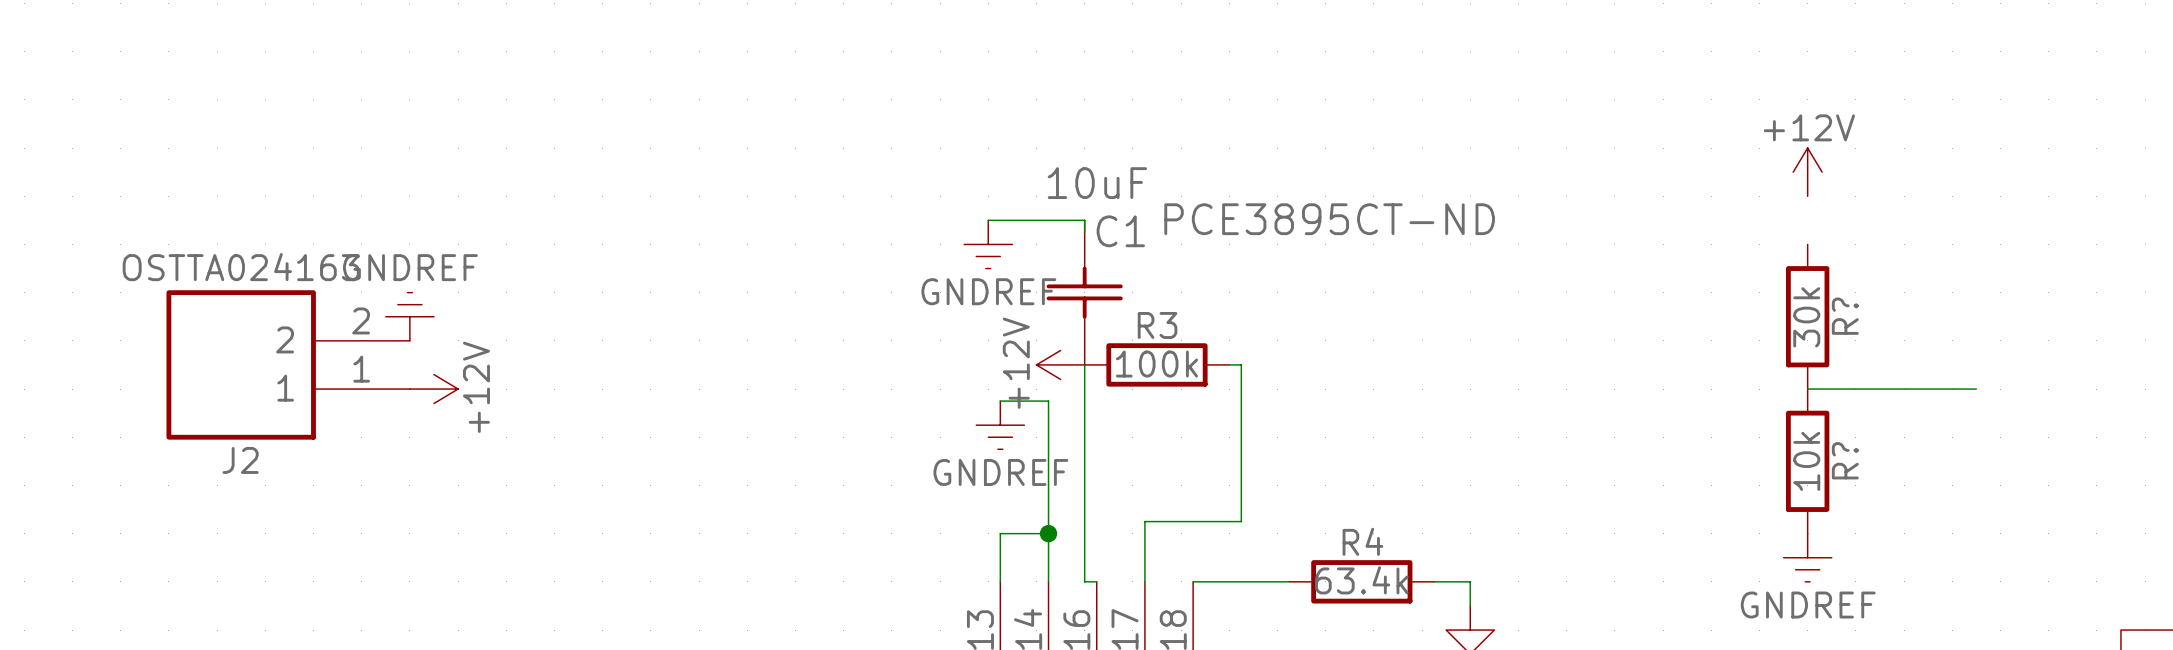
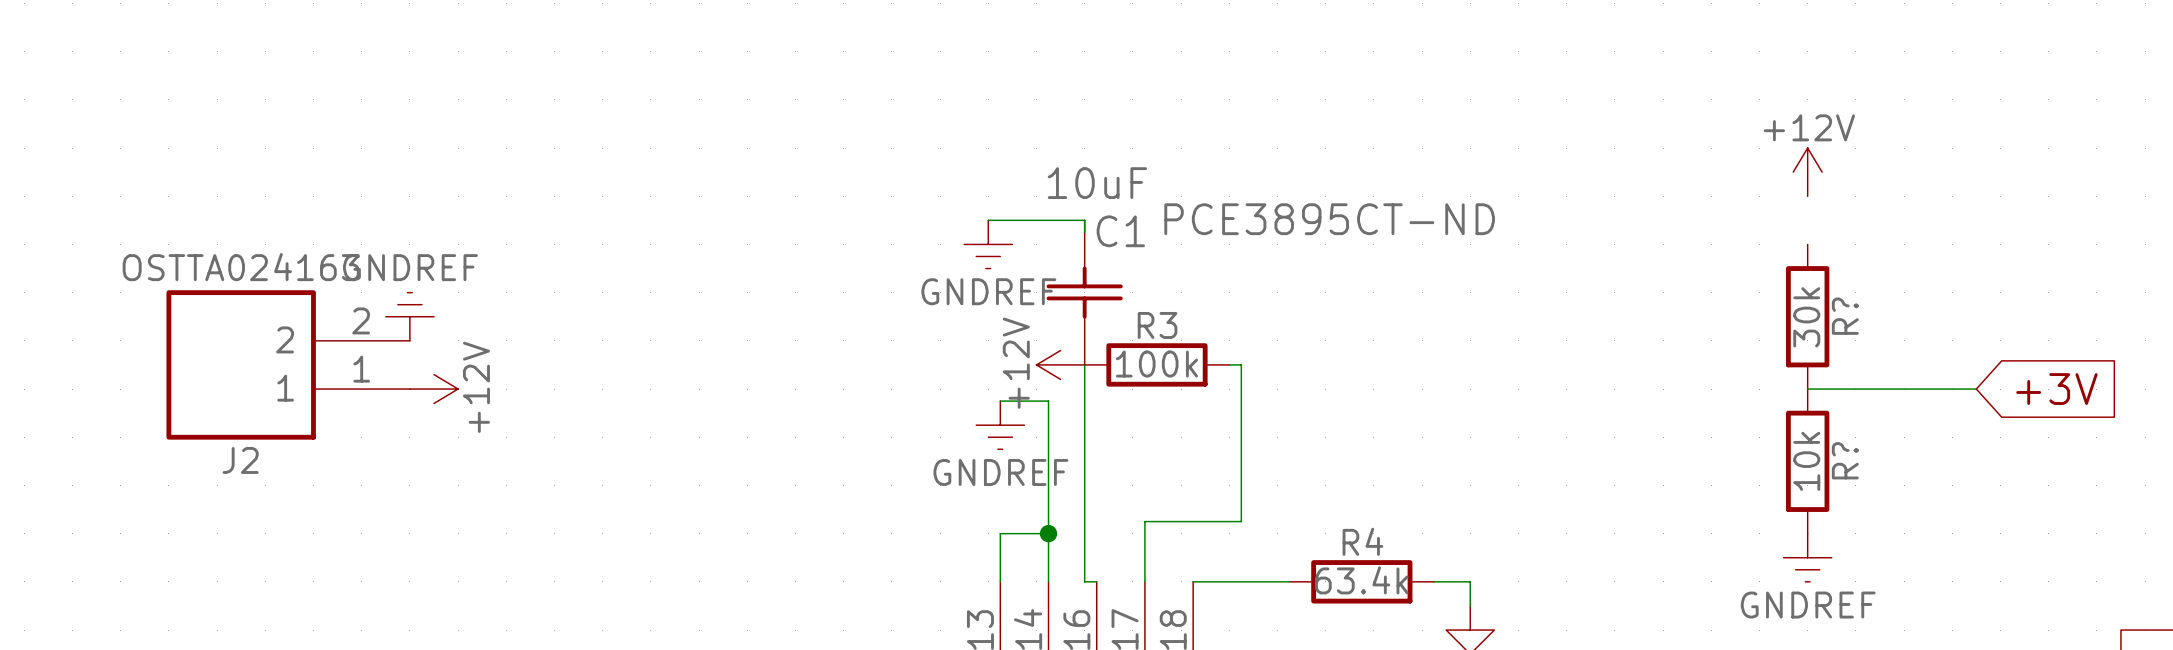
global label: none -> +3V (2056, 389)

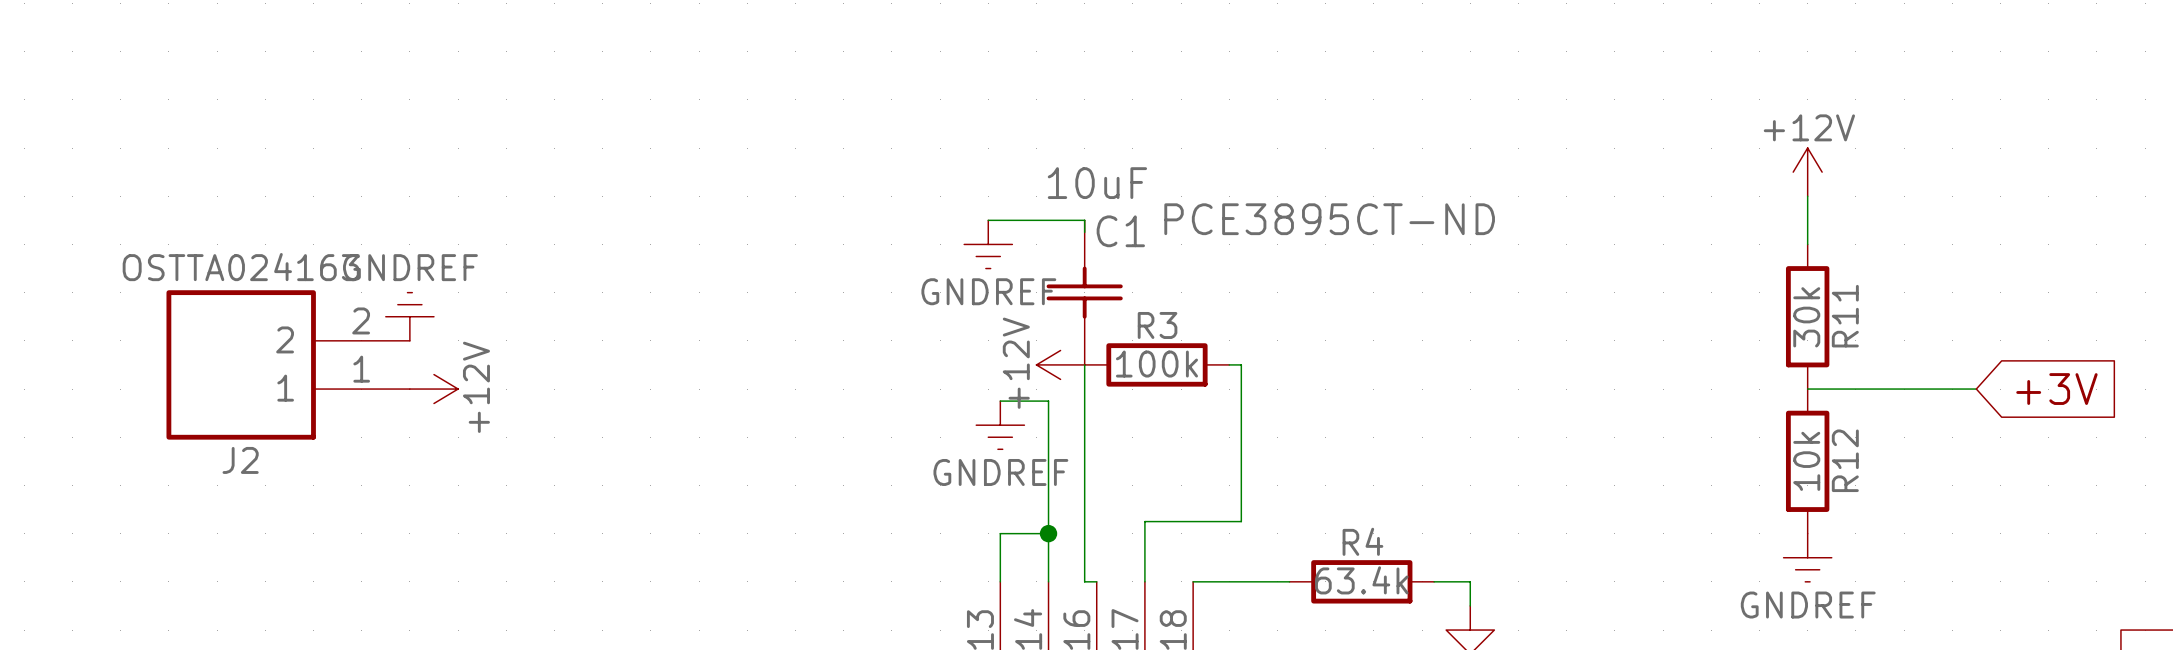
wire: none -> (1807, 196) (1807, 244)
R? name: R? (1845, 316) -> R11 (1845, 316)
R? name: R? (1845, 460) -> R12 (1845, 460)

